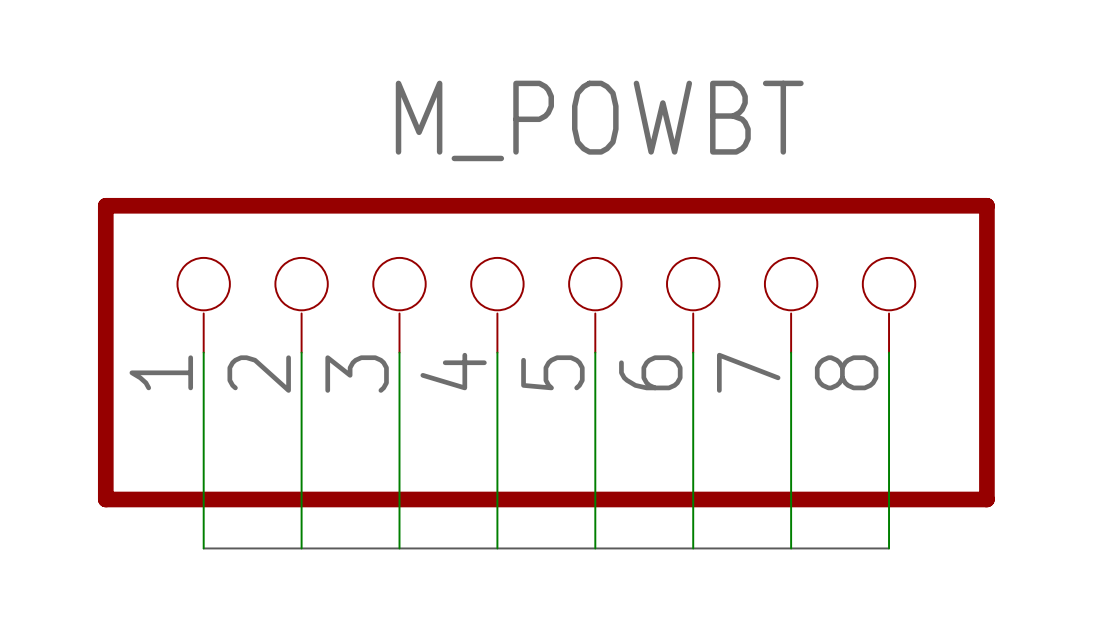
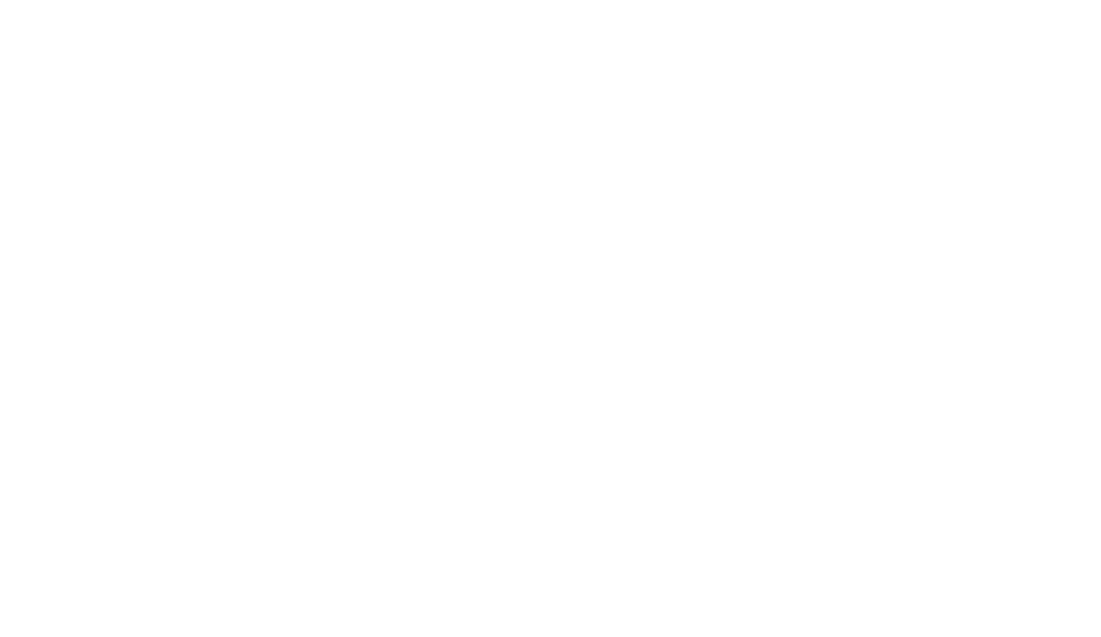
wire: (203, 352) (203, 548) -> none
wire: (301, 352) (301, 548) -> none
wire: (399, 352) (399, 548) -> none
wire: (497, 352) (497, 548) -> none
M_POWBT: (546, 352) -> none
wire: (595, 352) (595, 548) -> none
wire: (693, 352) (693, 548) -> none
wire: (791, 352) (791, 548) -> none
wire: (889, 352) (889, 548) -> none
bus: (203, 548) (889, 548) -> none

